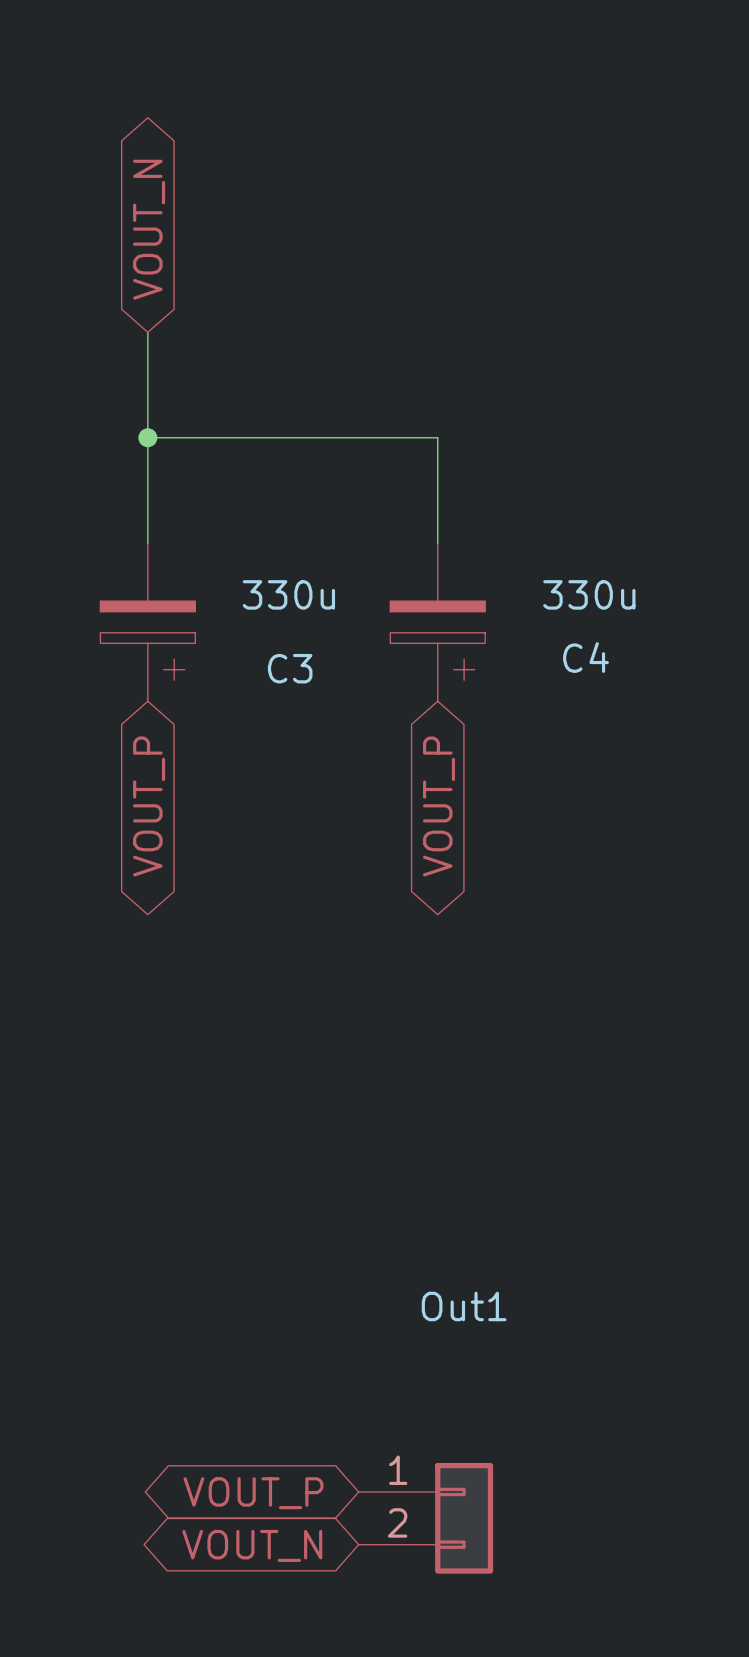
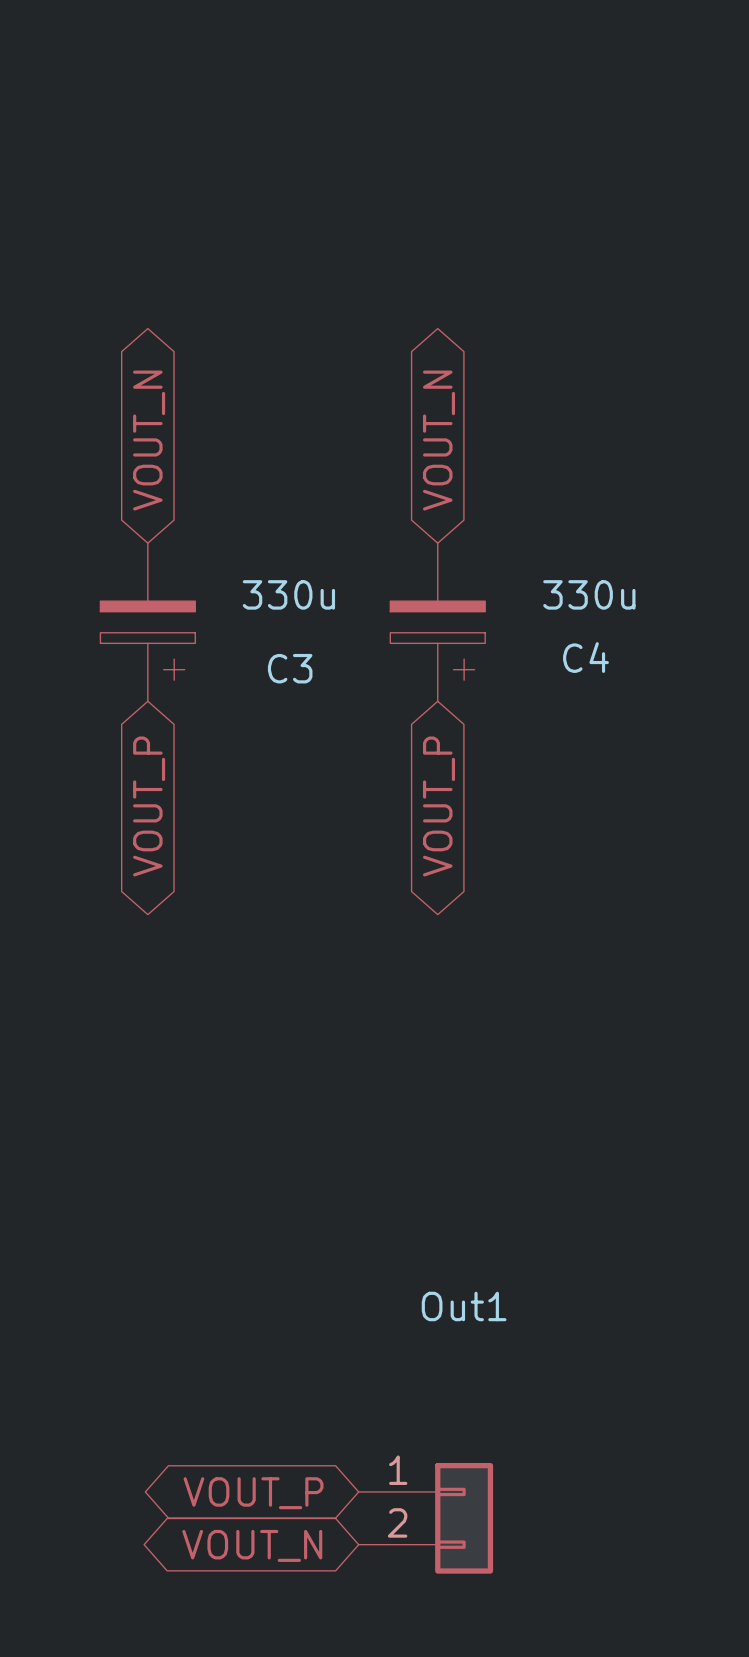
global label position: VOUT_N (149, 229) -> VOUT_N (149, 440)
wire: (147, 332) (147, 543) -> none
wire: (147, 437) (437, 437) (437, 543) -> none
junction: (147, 437) -> none
global label: none -> VOUT_N (439, 440)

